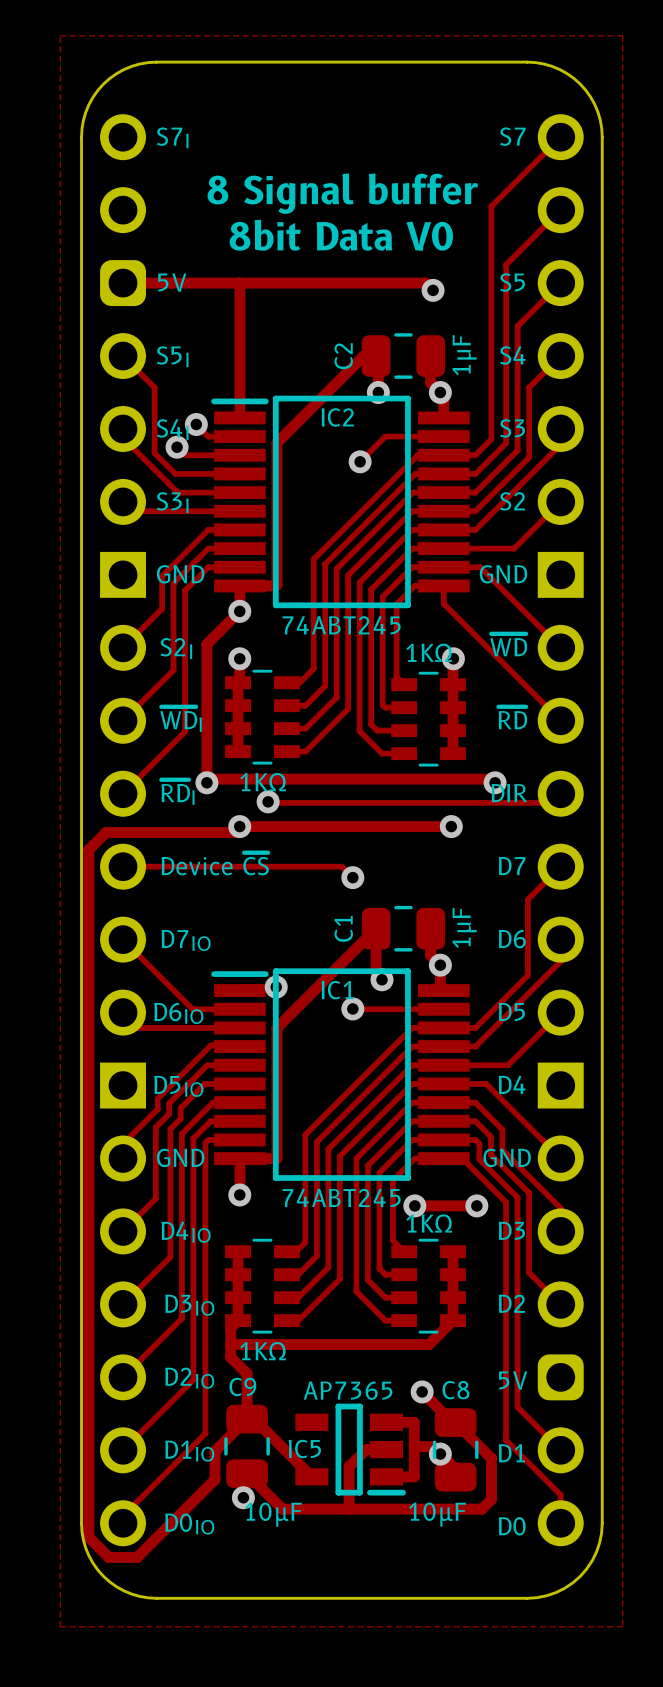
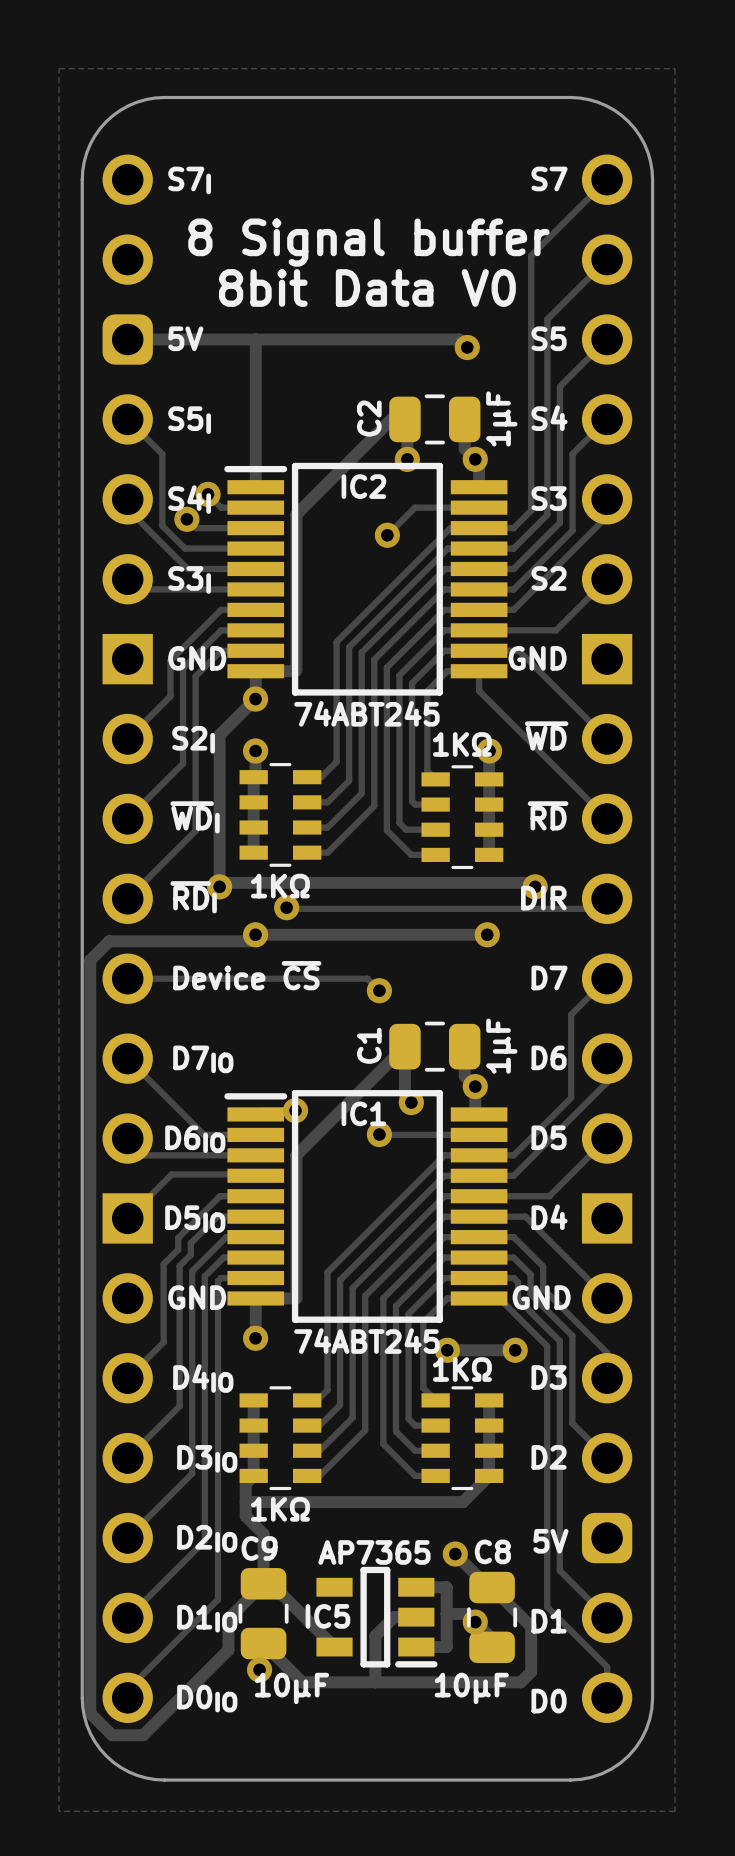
track: (210, 1045) (157, 1098) (157, 1109) (123, 1143) -> (223, 1174) (171, 1174) (127, 1218)

